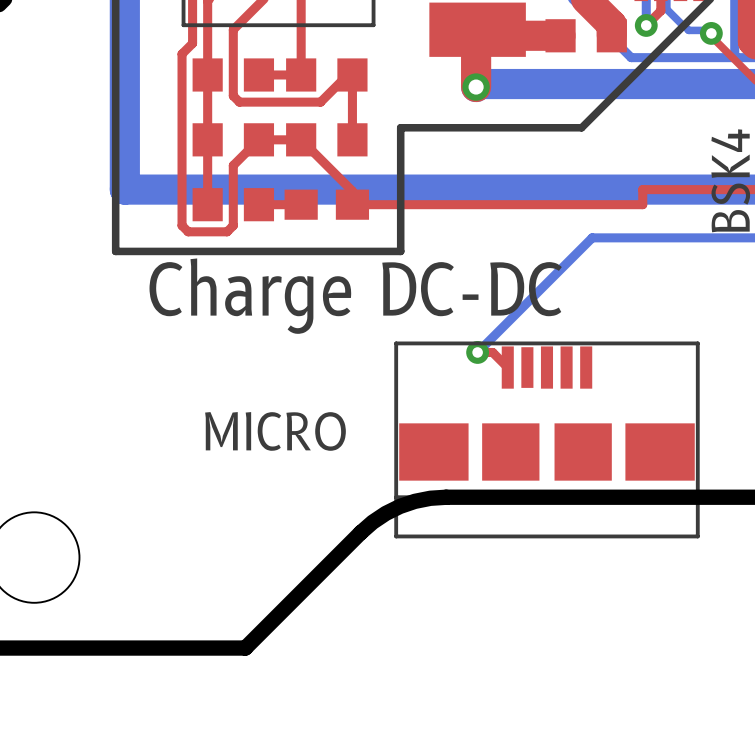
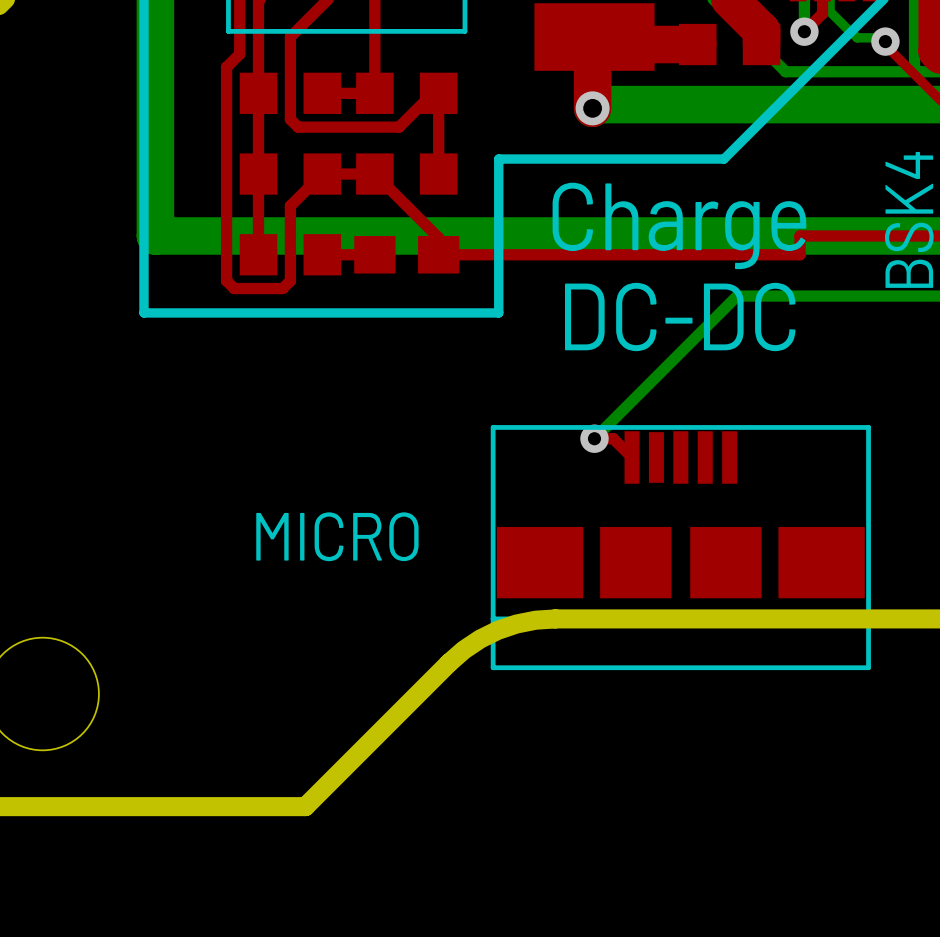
text: none -> Charge (679, 225)
text: none -> DC-DC (680, 316)
text: Charge DC-DC (355, 296) -> none

